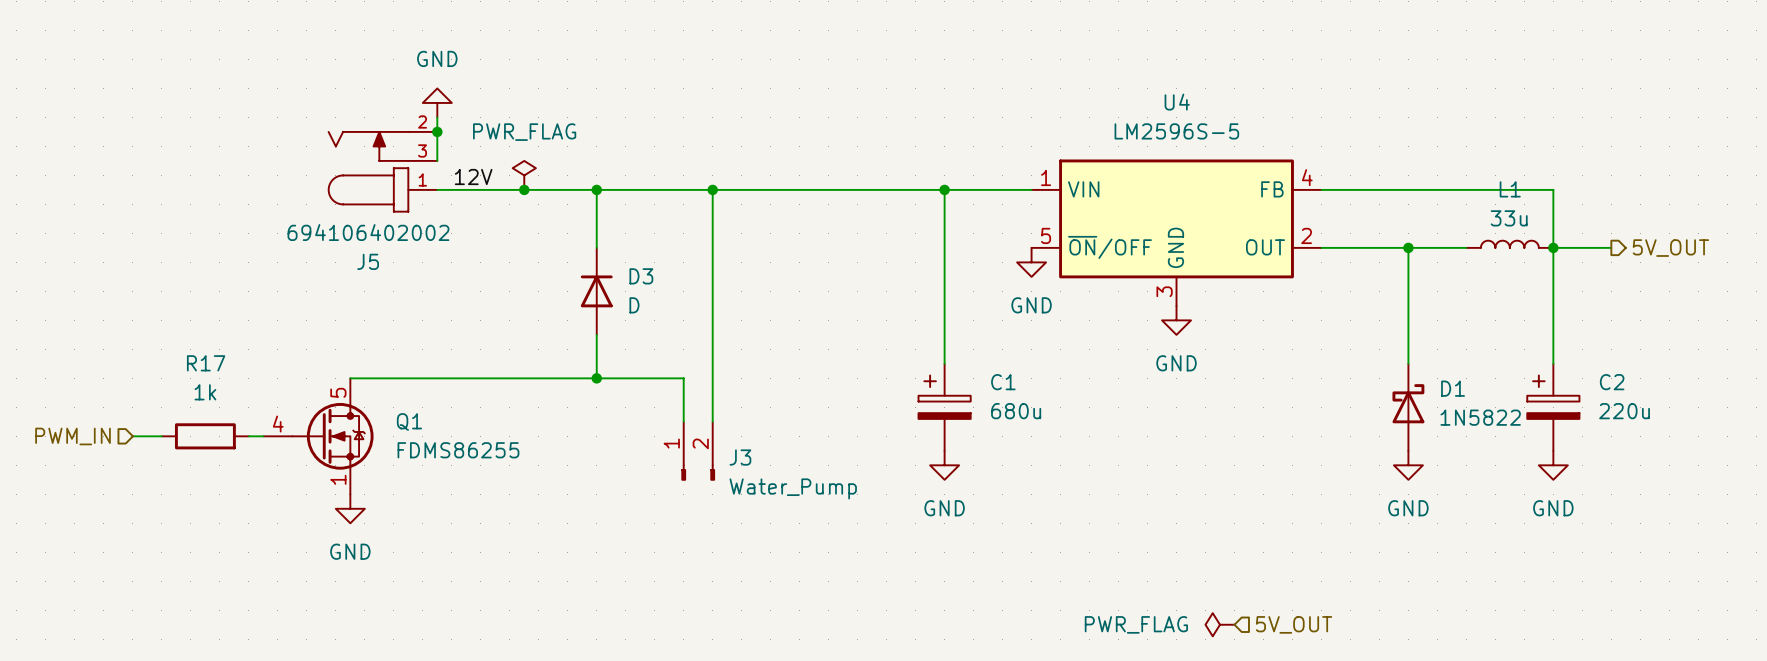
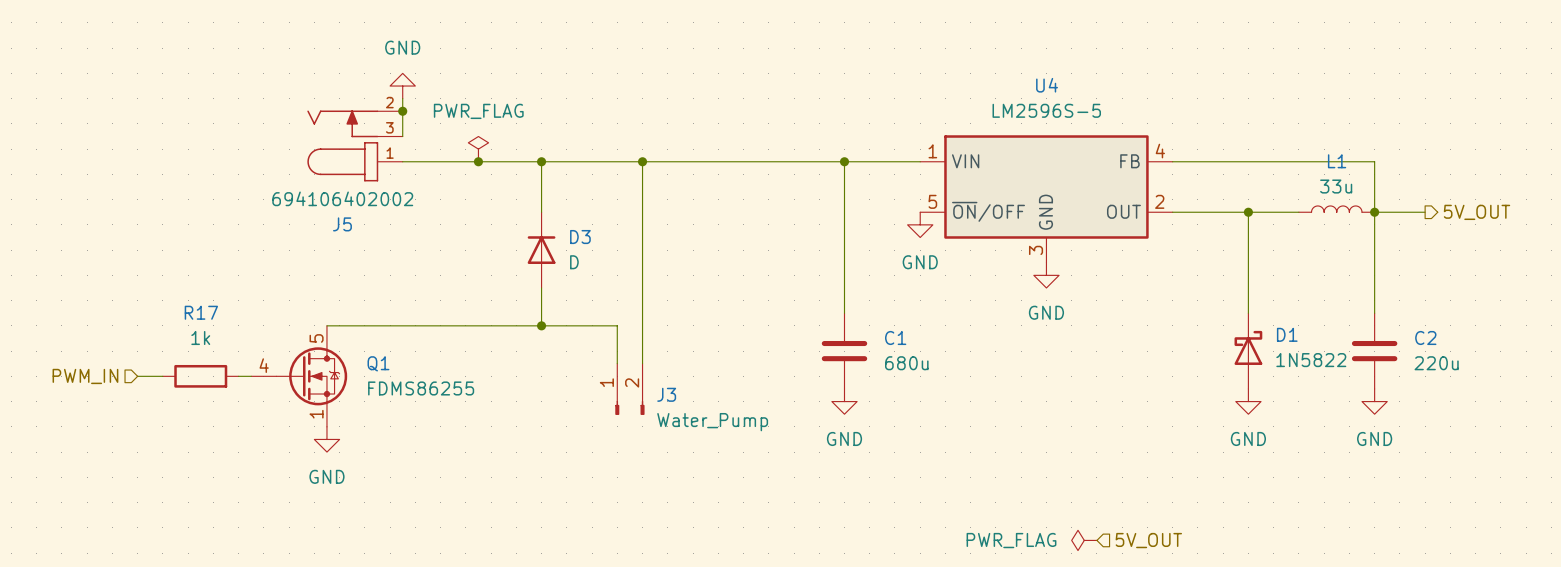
label: 12V (473, 176) -> none
C1 symbol: [918, 363, 971, 451] -> [821, 313, 868, 389]
C2 symbol: [1527, 363, 1580, 451] -> [1351, 313, 1398, 389]

